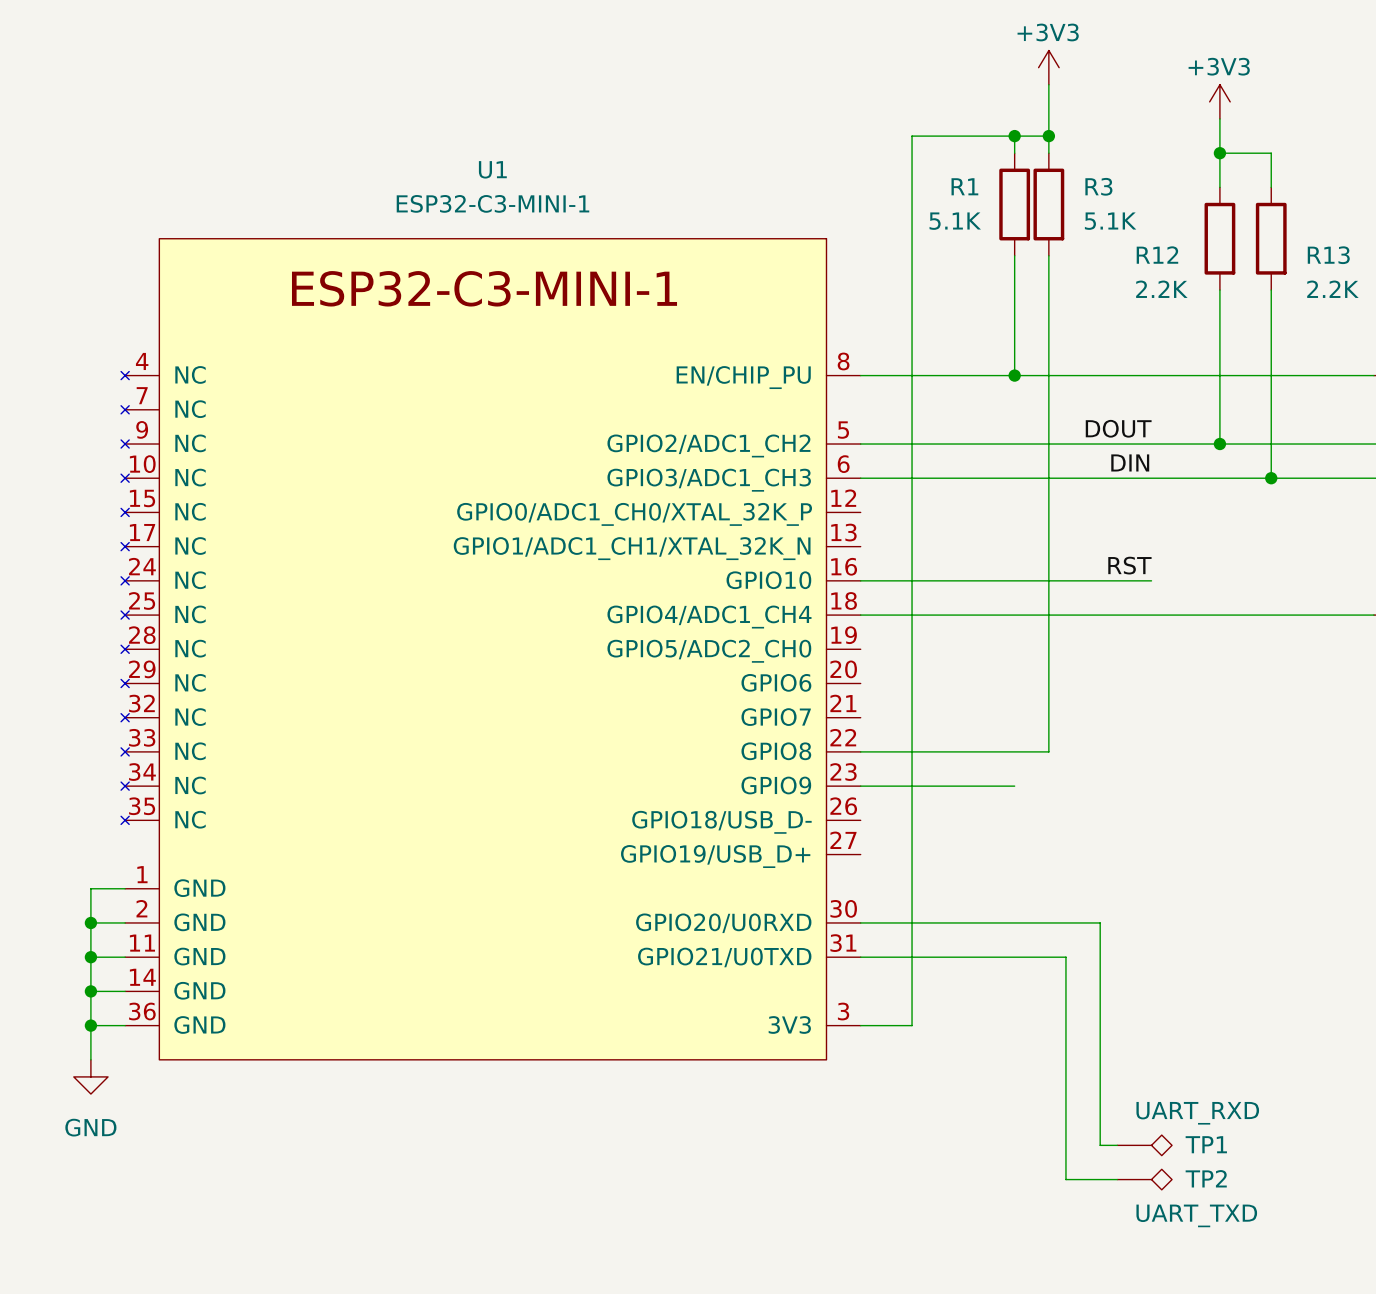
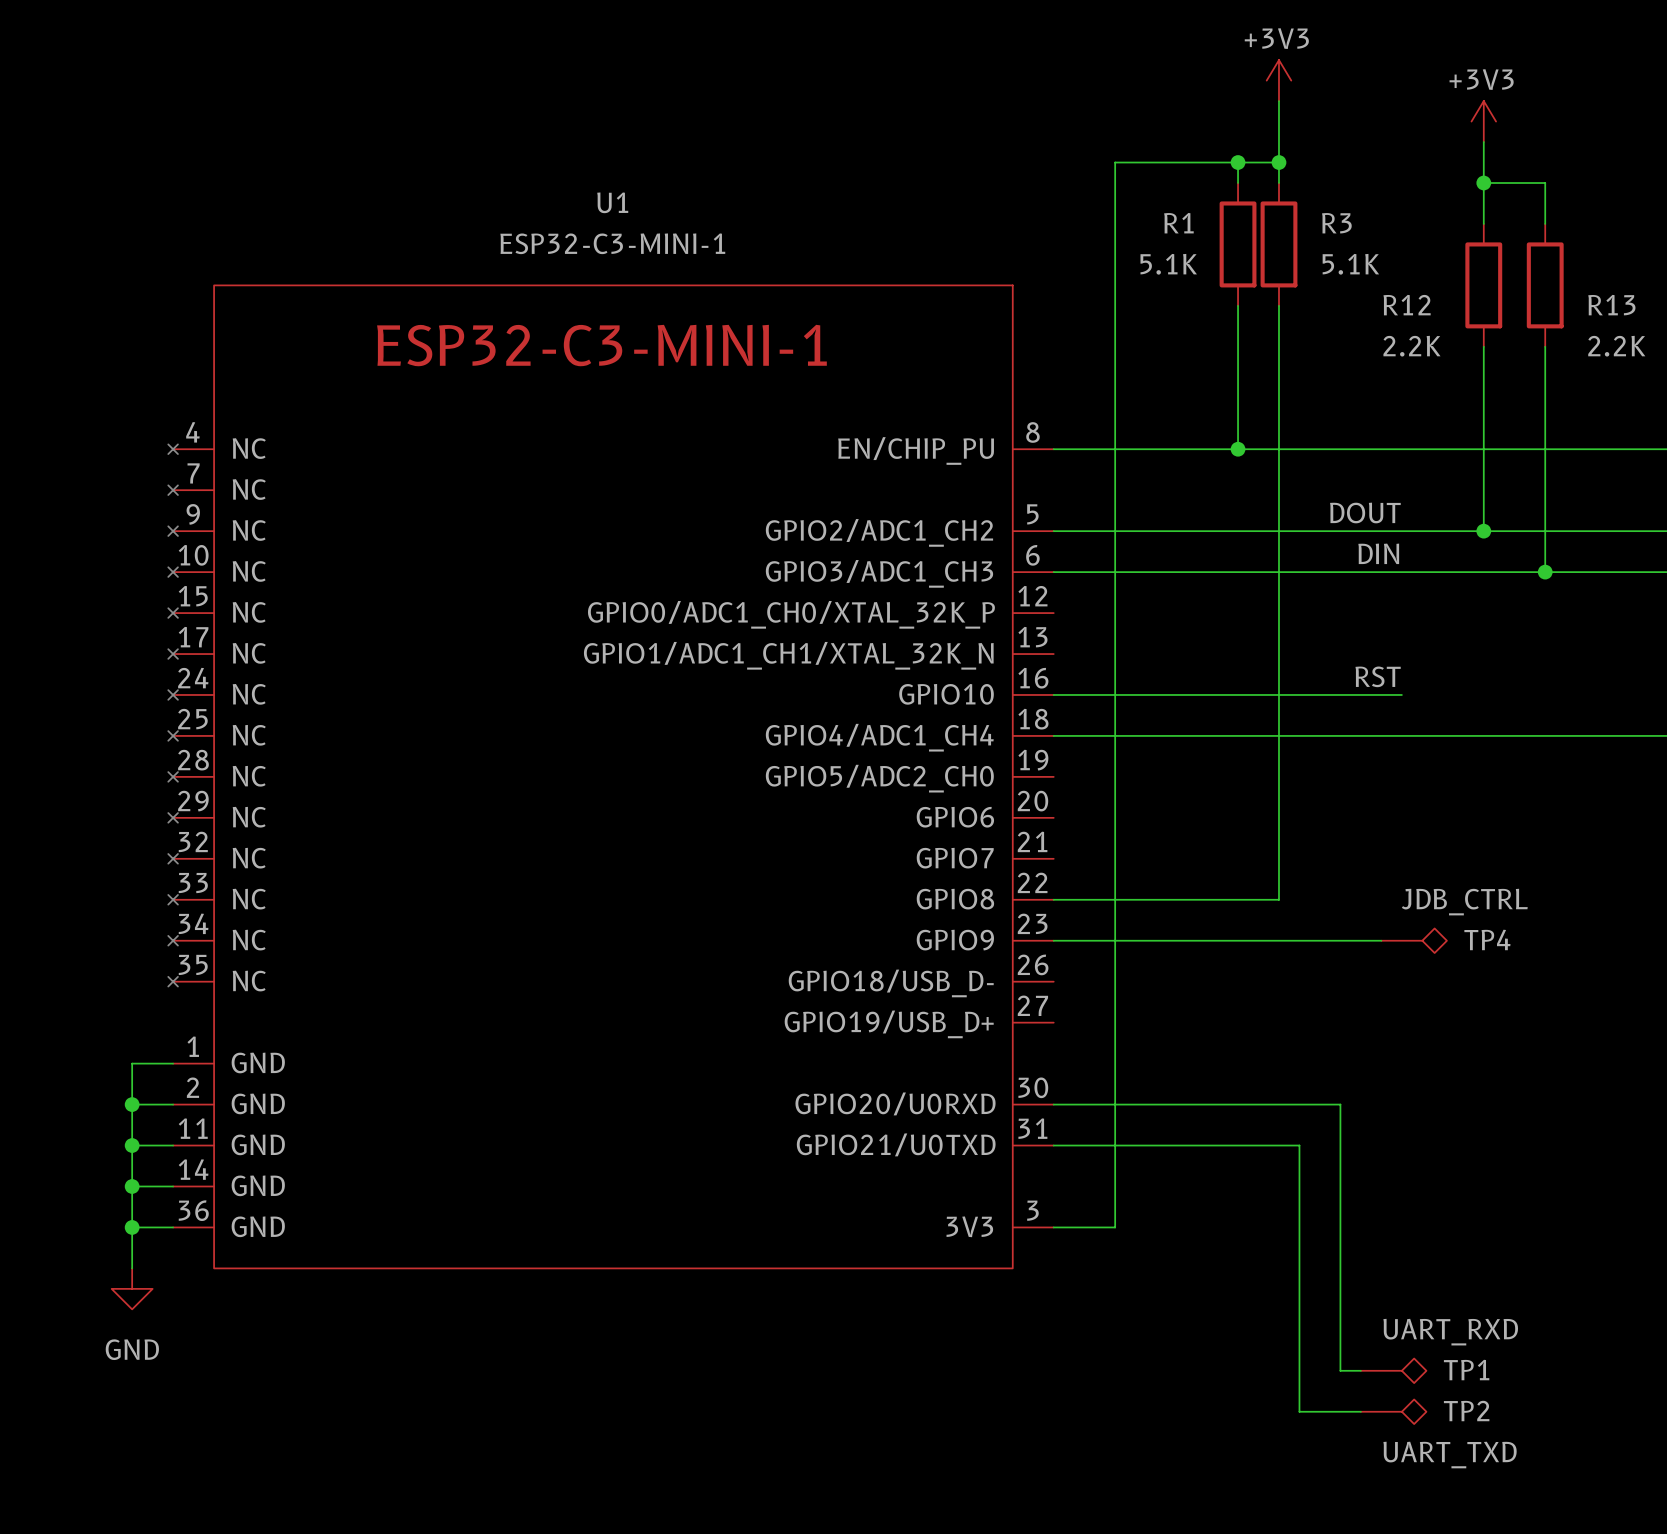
wire: none -> (1238, 940) (1381, 940)
TP4: none -> JDB_CTRL (1414, 940)

